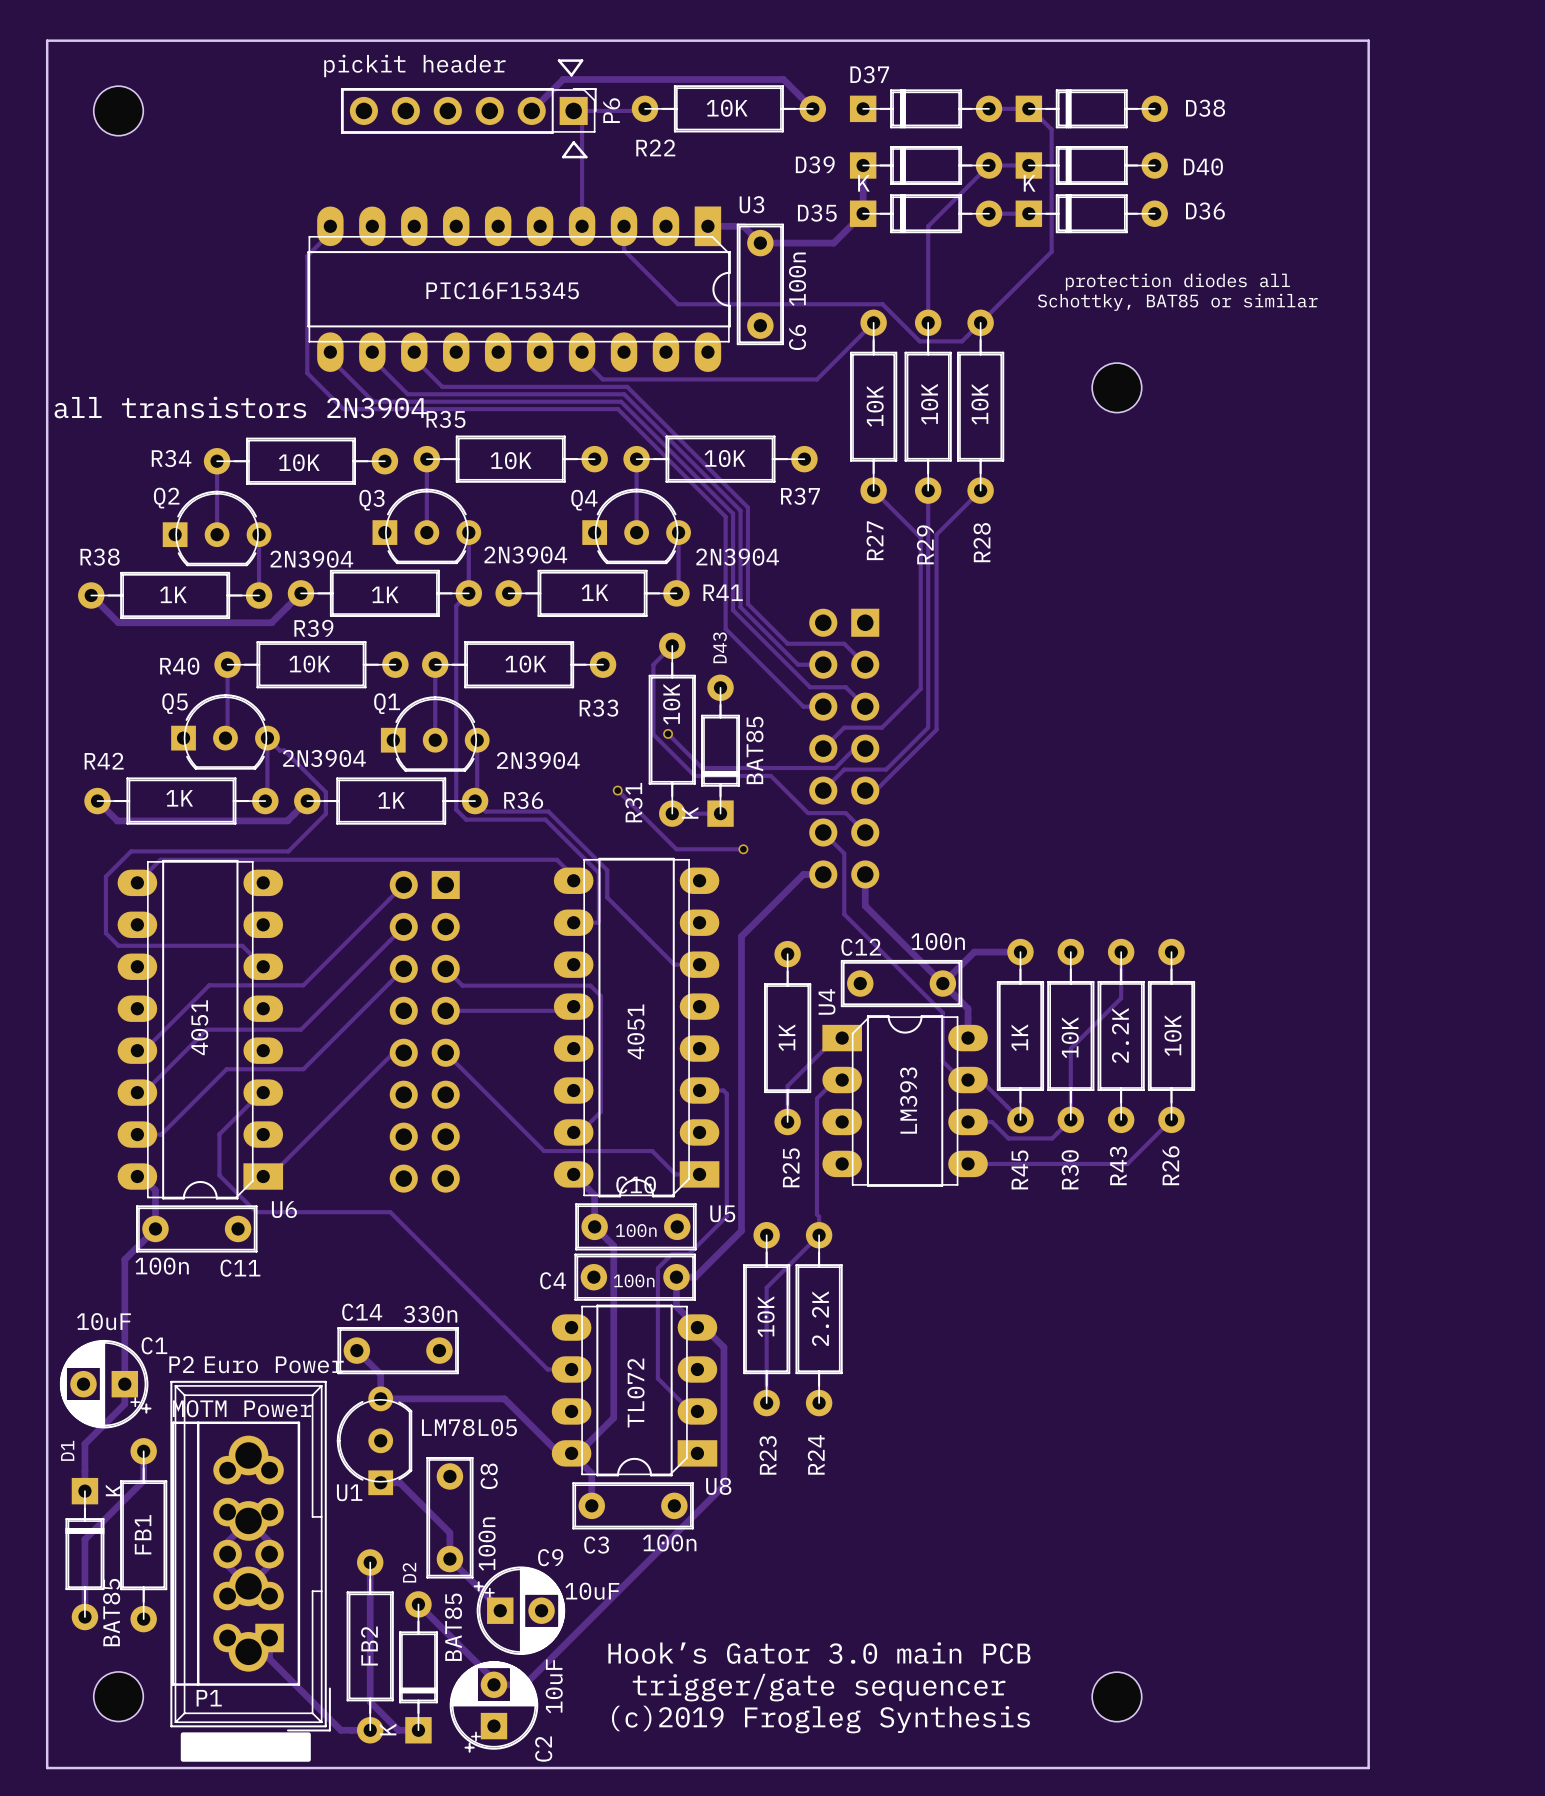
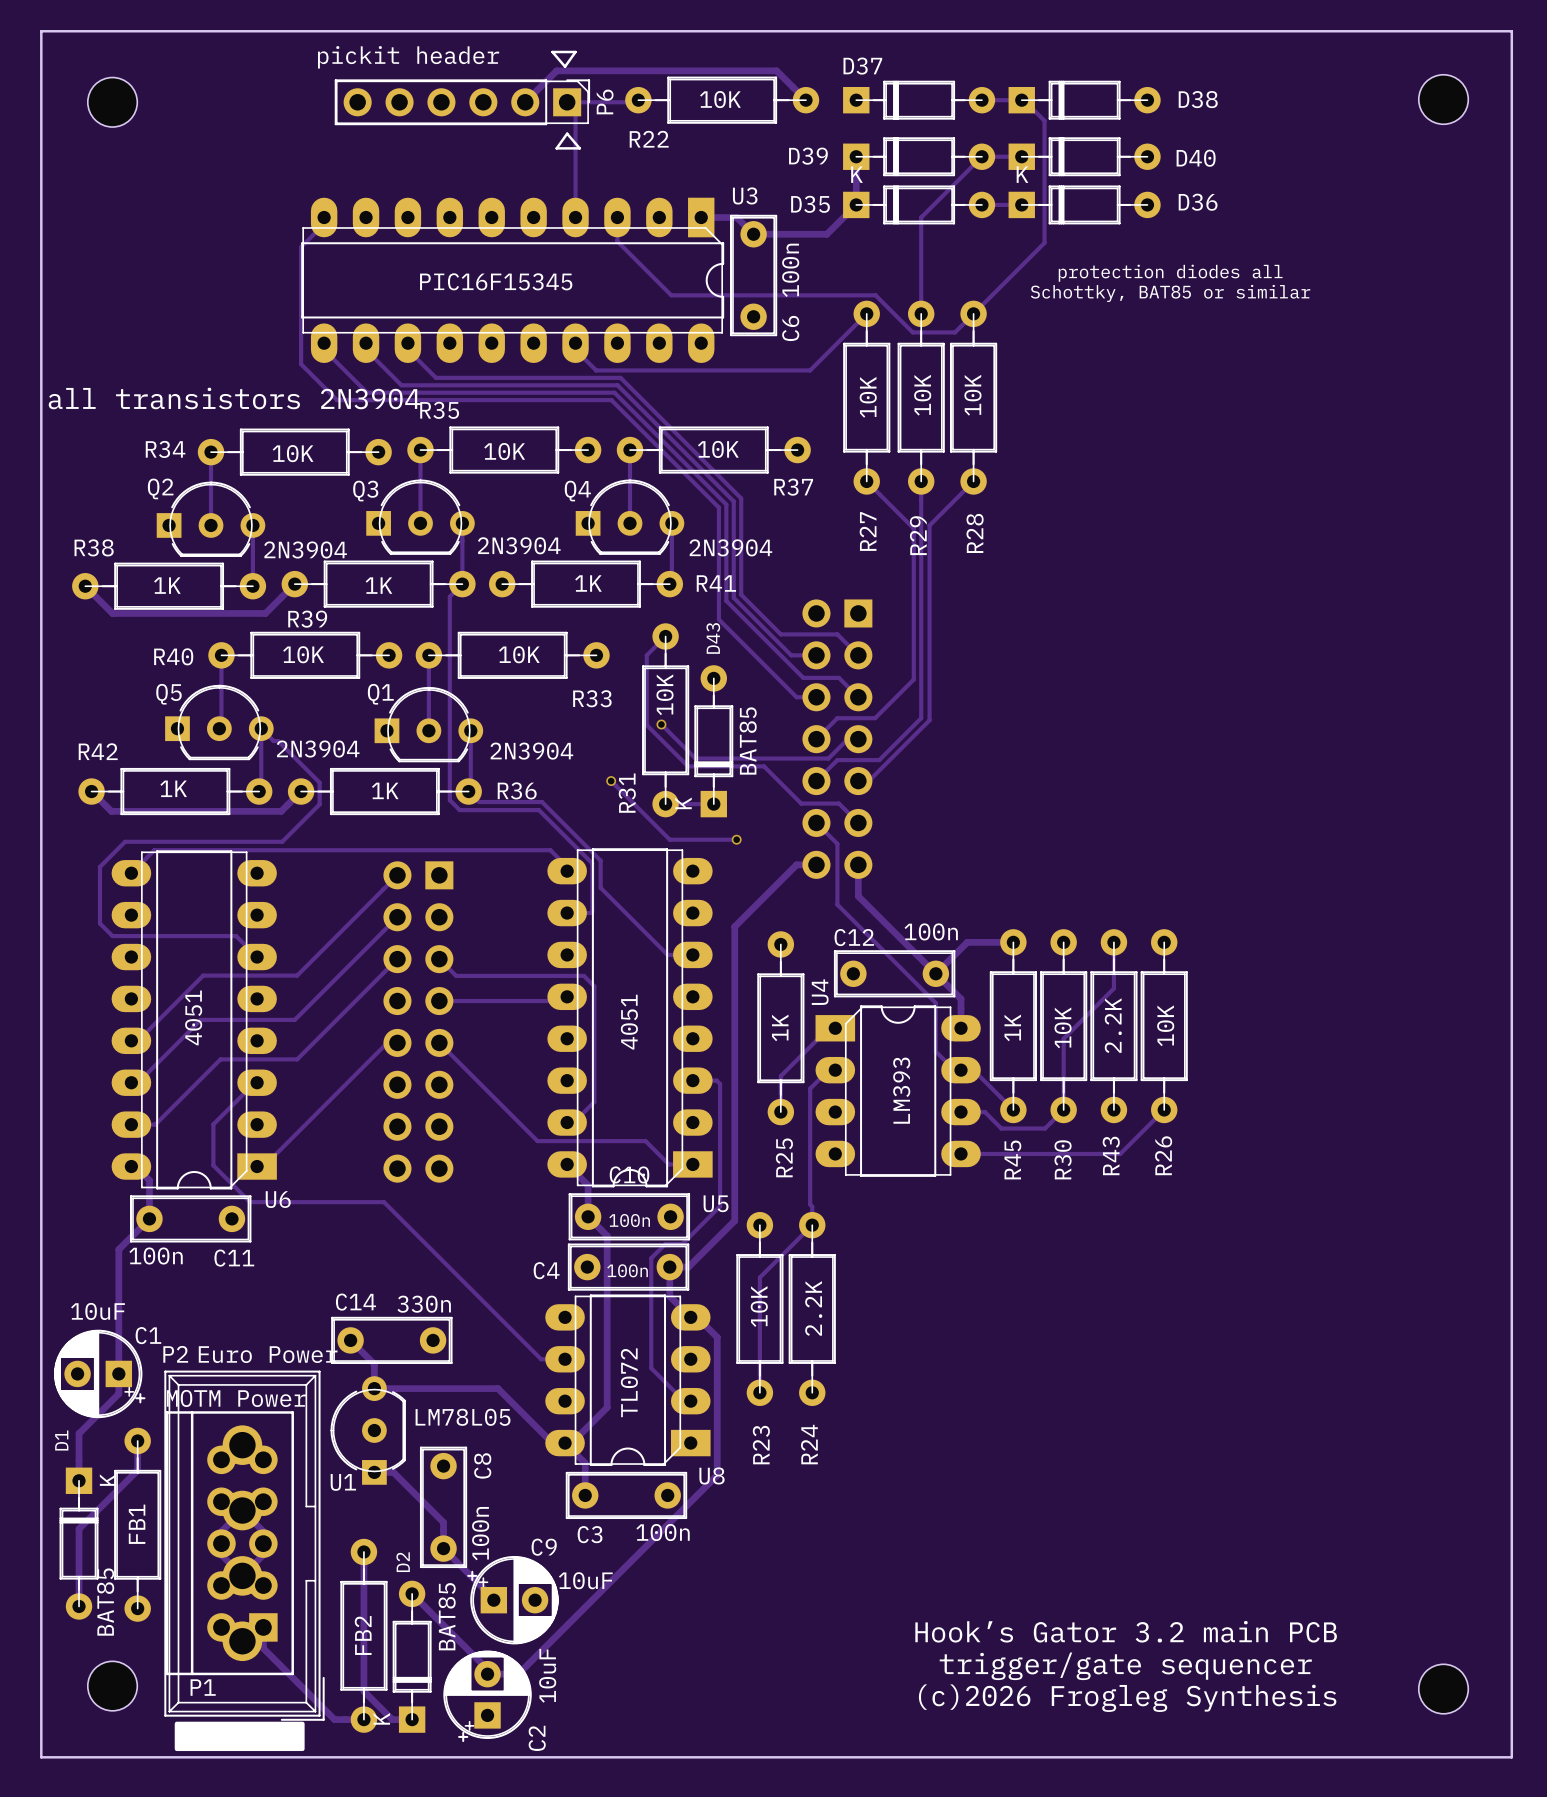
board edge: (47, 40) (1368, 40) (1368, 1768) -> (41, 32) (1511, 31) (1511, 1757) (1361, 1757)
part: none -> (1443, 99)
part: (1116, 387) -> none
text: Hook’s Gator 3.0 main PCB (819, 1653) -> Hook’s Gator 3.2 main PCB (1126, 1631)
text position: trigger/gate sequencer (819, 1687) -> trigger/gate sequencer (1125, 1666)
part position: (1116, 1696) -> (1443, 1689)
text: (c)2019 Frogleg Synthesis (820, 1719) -> (c)2026 Frogleg Synthesis (1127, 1698)

